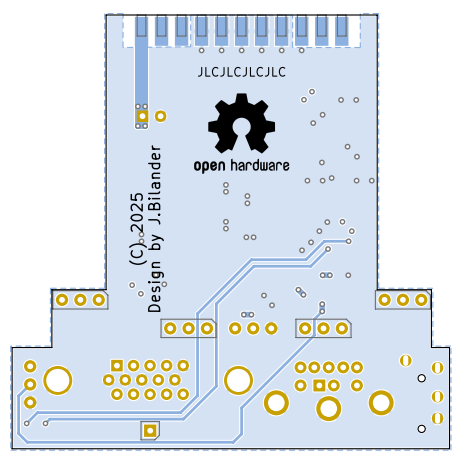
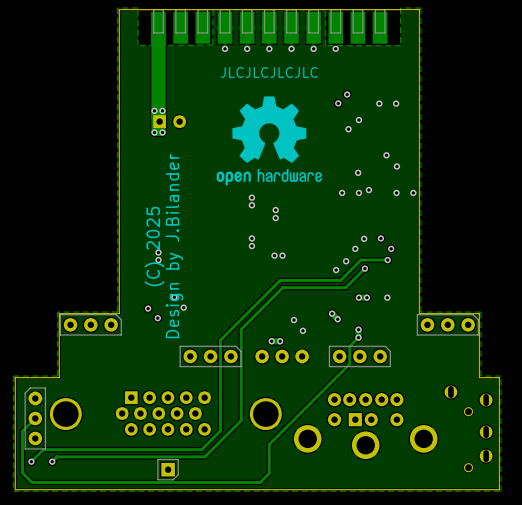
part side: top (30, 384) -> bottom (35, 418)

